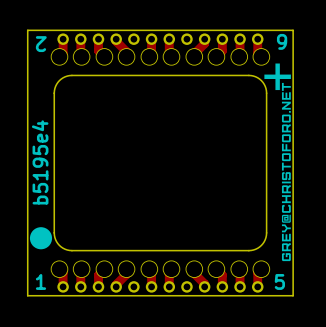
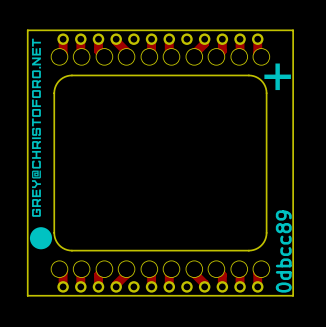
drawing: none -> [32, 38, 41, 217]
text: 6 (282, 41) -> none
text: 2 (41, 44) -> none
drawing: [281, 82, 291, 262] -> none
text: b5195e4 (40, 162) -> none
text: none -> 0dbcc89 (283, 251)
text: 1 (40, 281) -> none
text: 5 (279, 281) -> none

